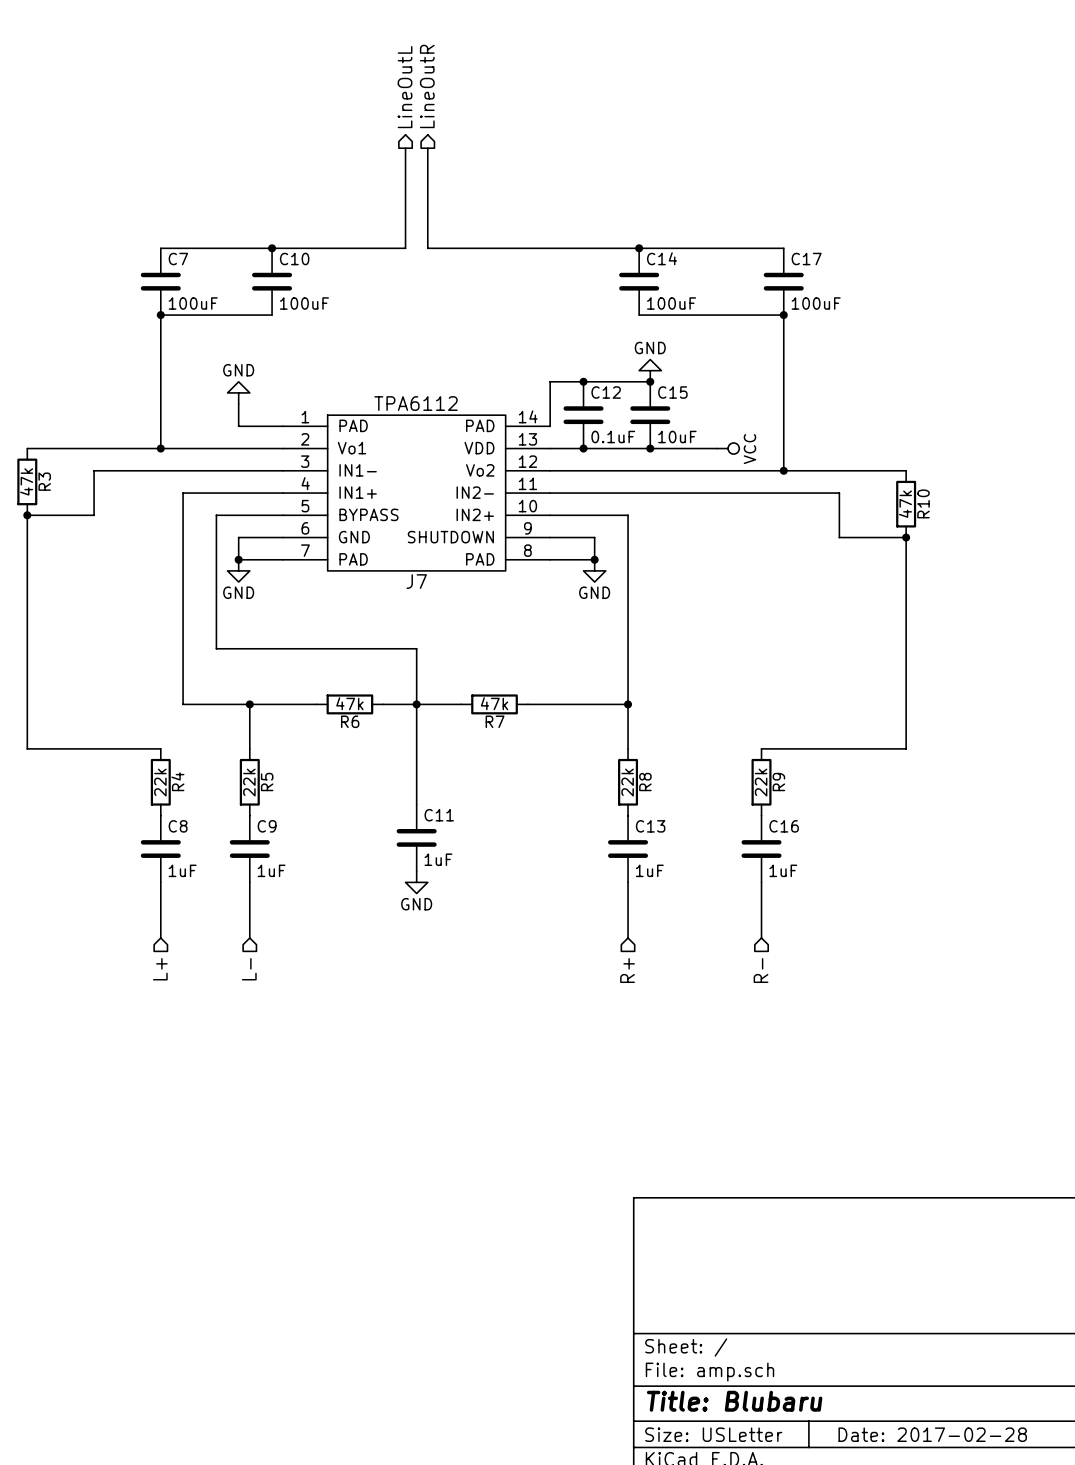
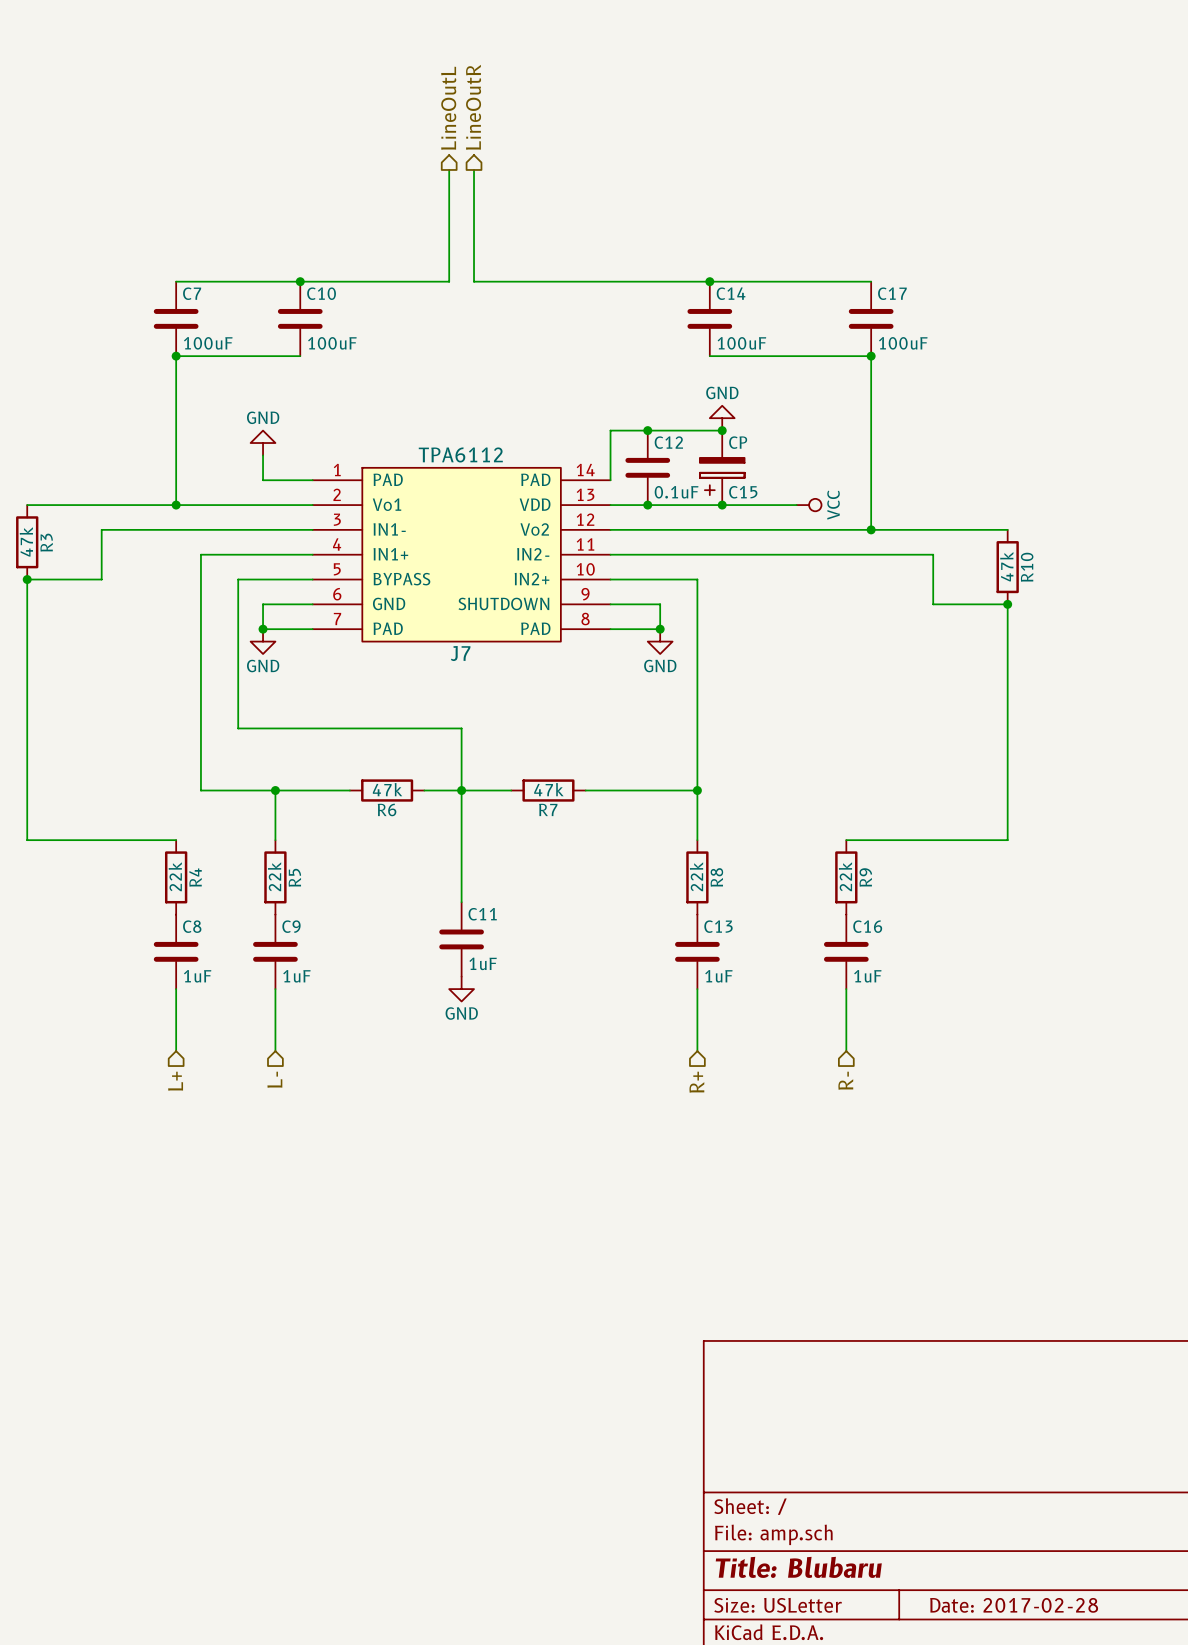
C15 symbol: [630, 381, 671, 449] -> [699, 430, 745, 506]
C15 name position: C15 (672, 392) -> C15 (743, 492)
C15 value: 10uF (677, 437) -> CP (738, 442)

